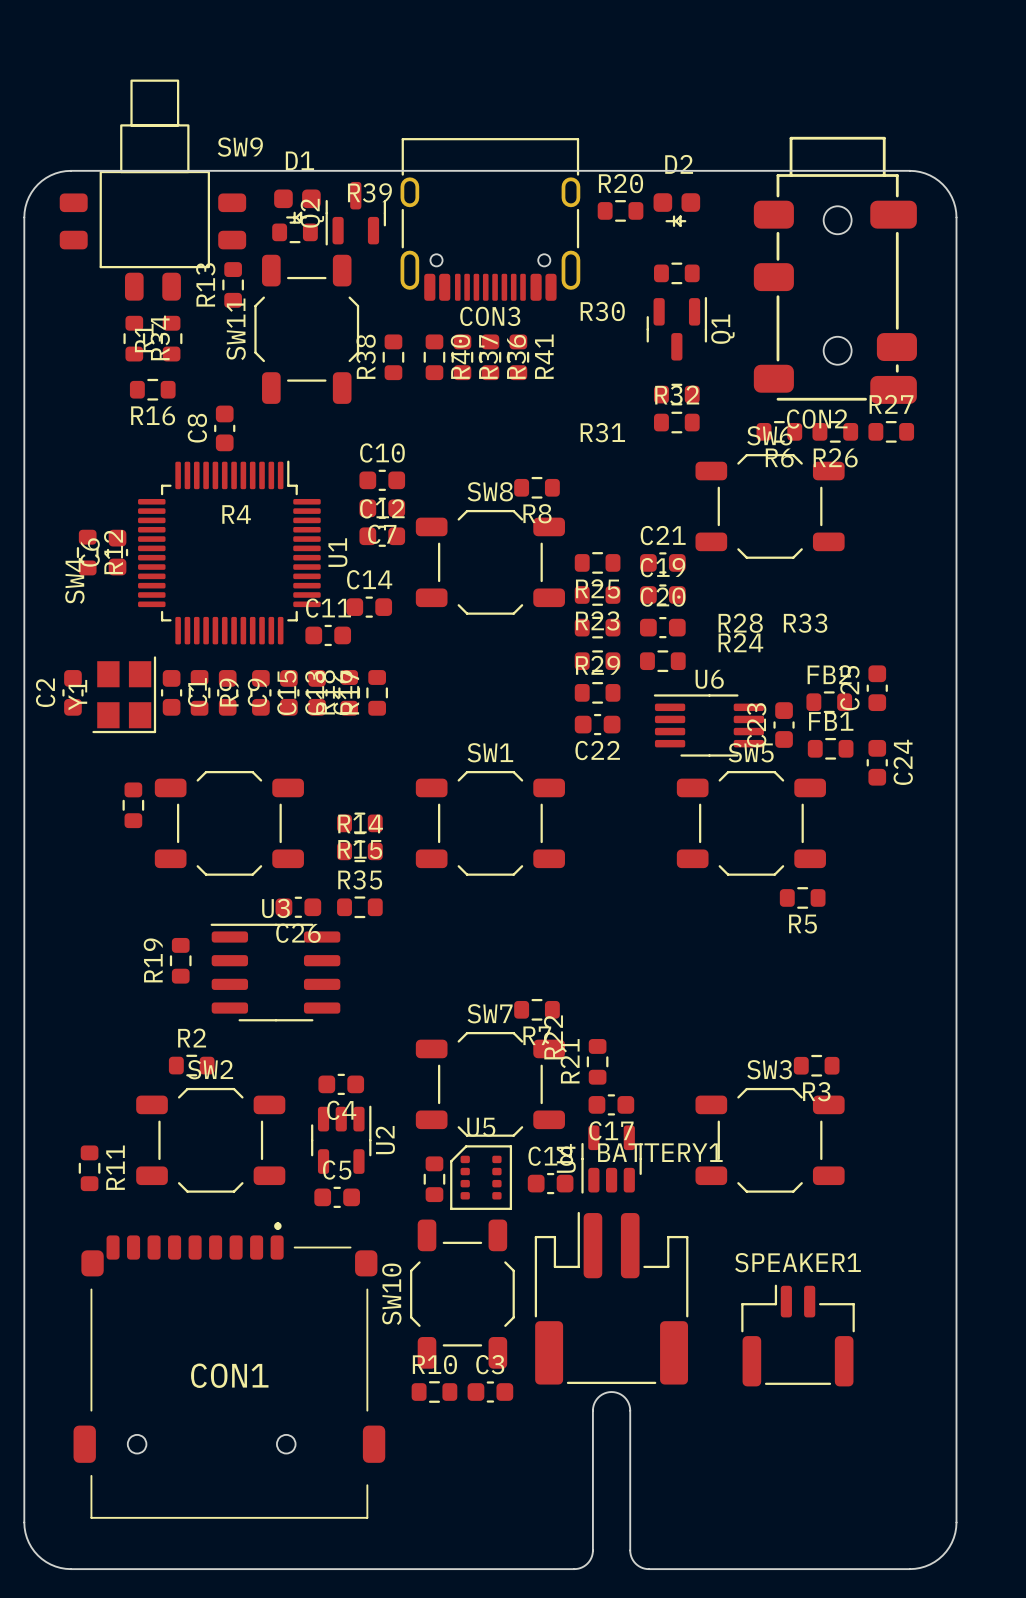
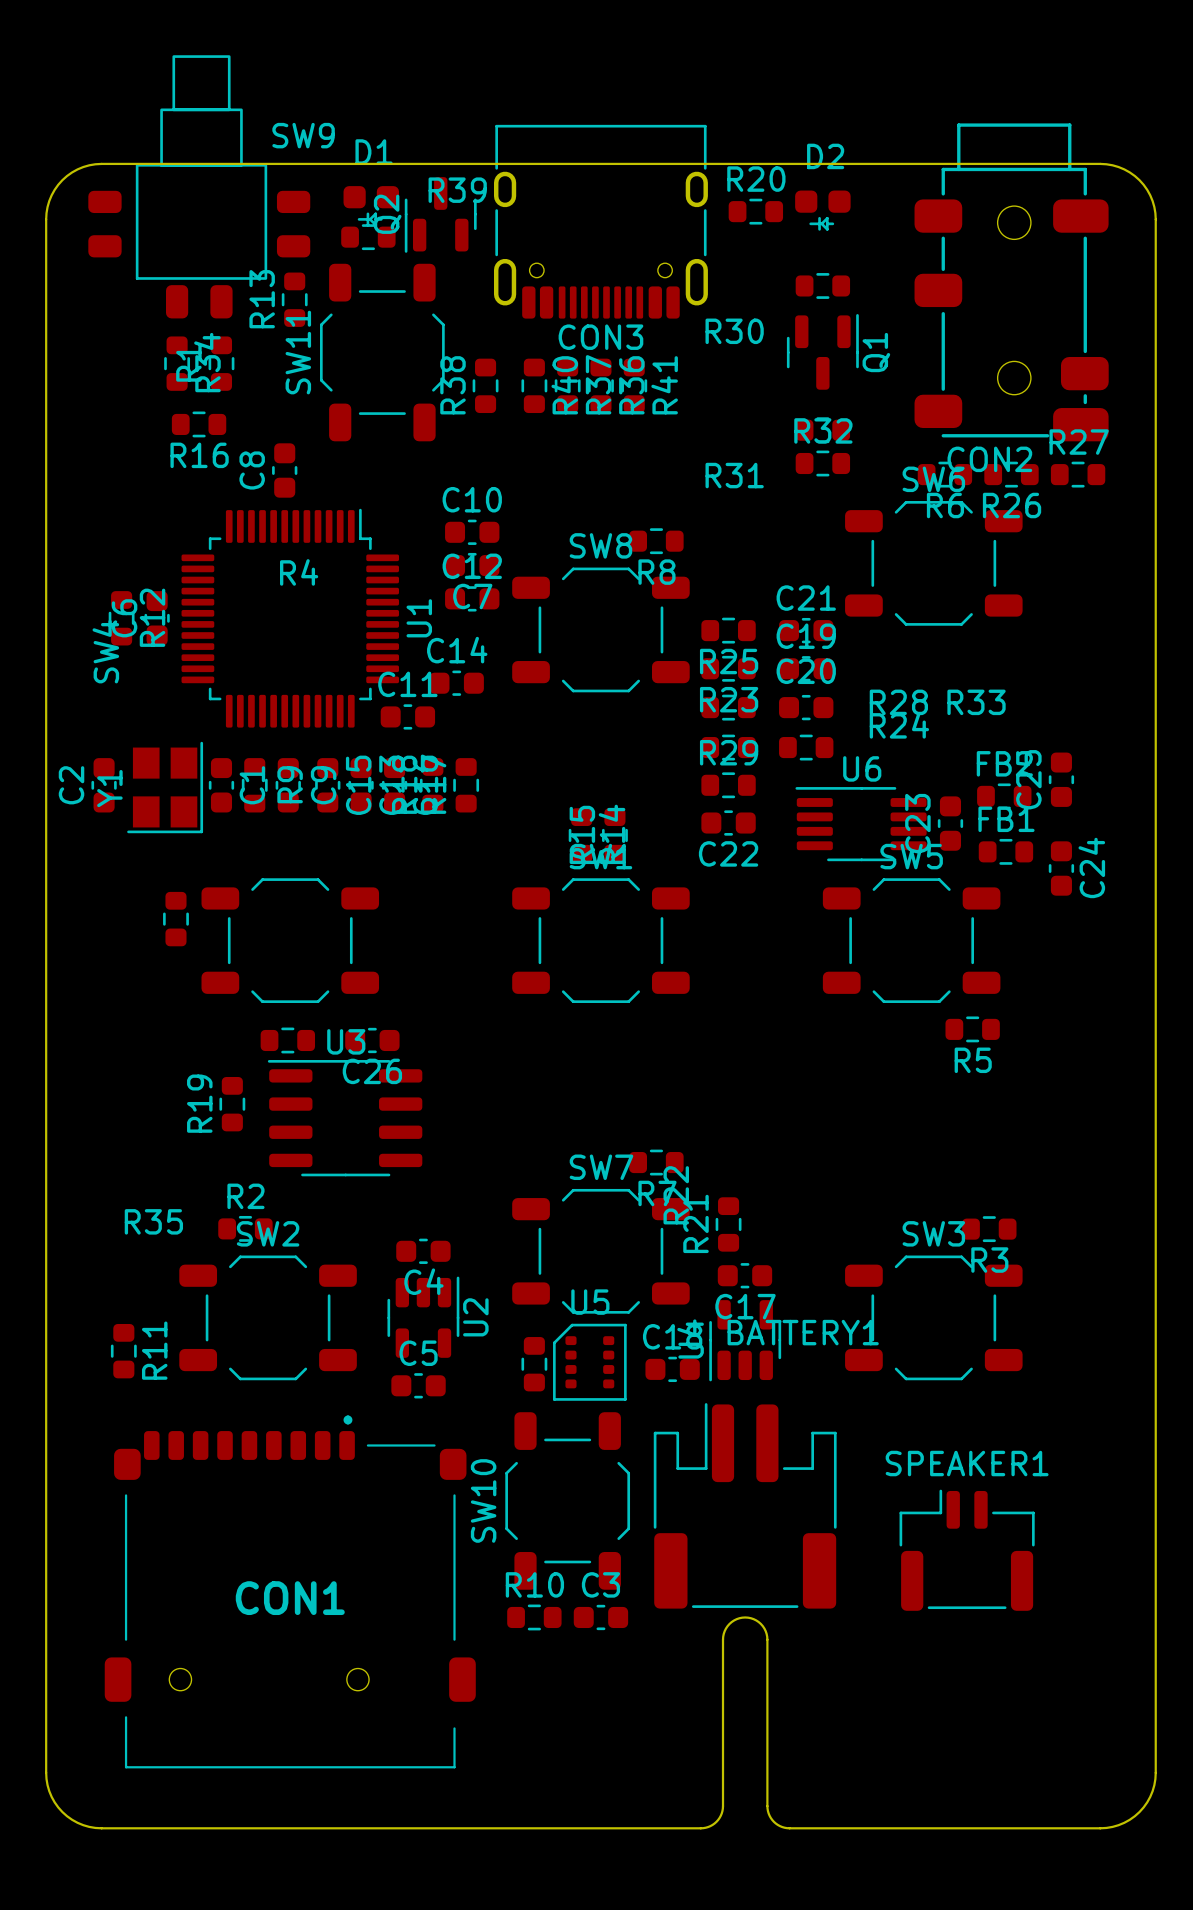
R15 rotation: 0° (359, 823) -> 90° clockwise (614, 835)
R15 position: (359, 823) -> (614, 835)
R14 rotation: 0° (359, 851) -> 90° clockwise (581, 835)
R14 position: (359, 851) -> (581, 835)
R35 name position: R35 (360, 879) -> R35 (153, 1221)
R35 position: (359, 907) -> (287, 1040)

